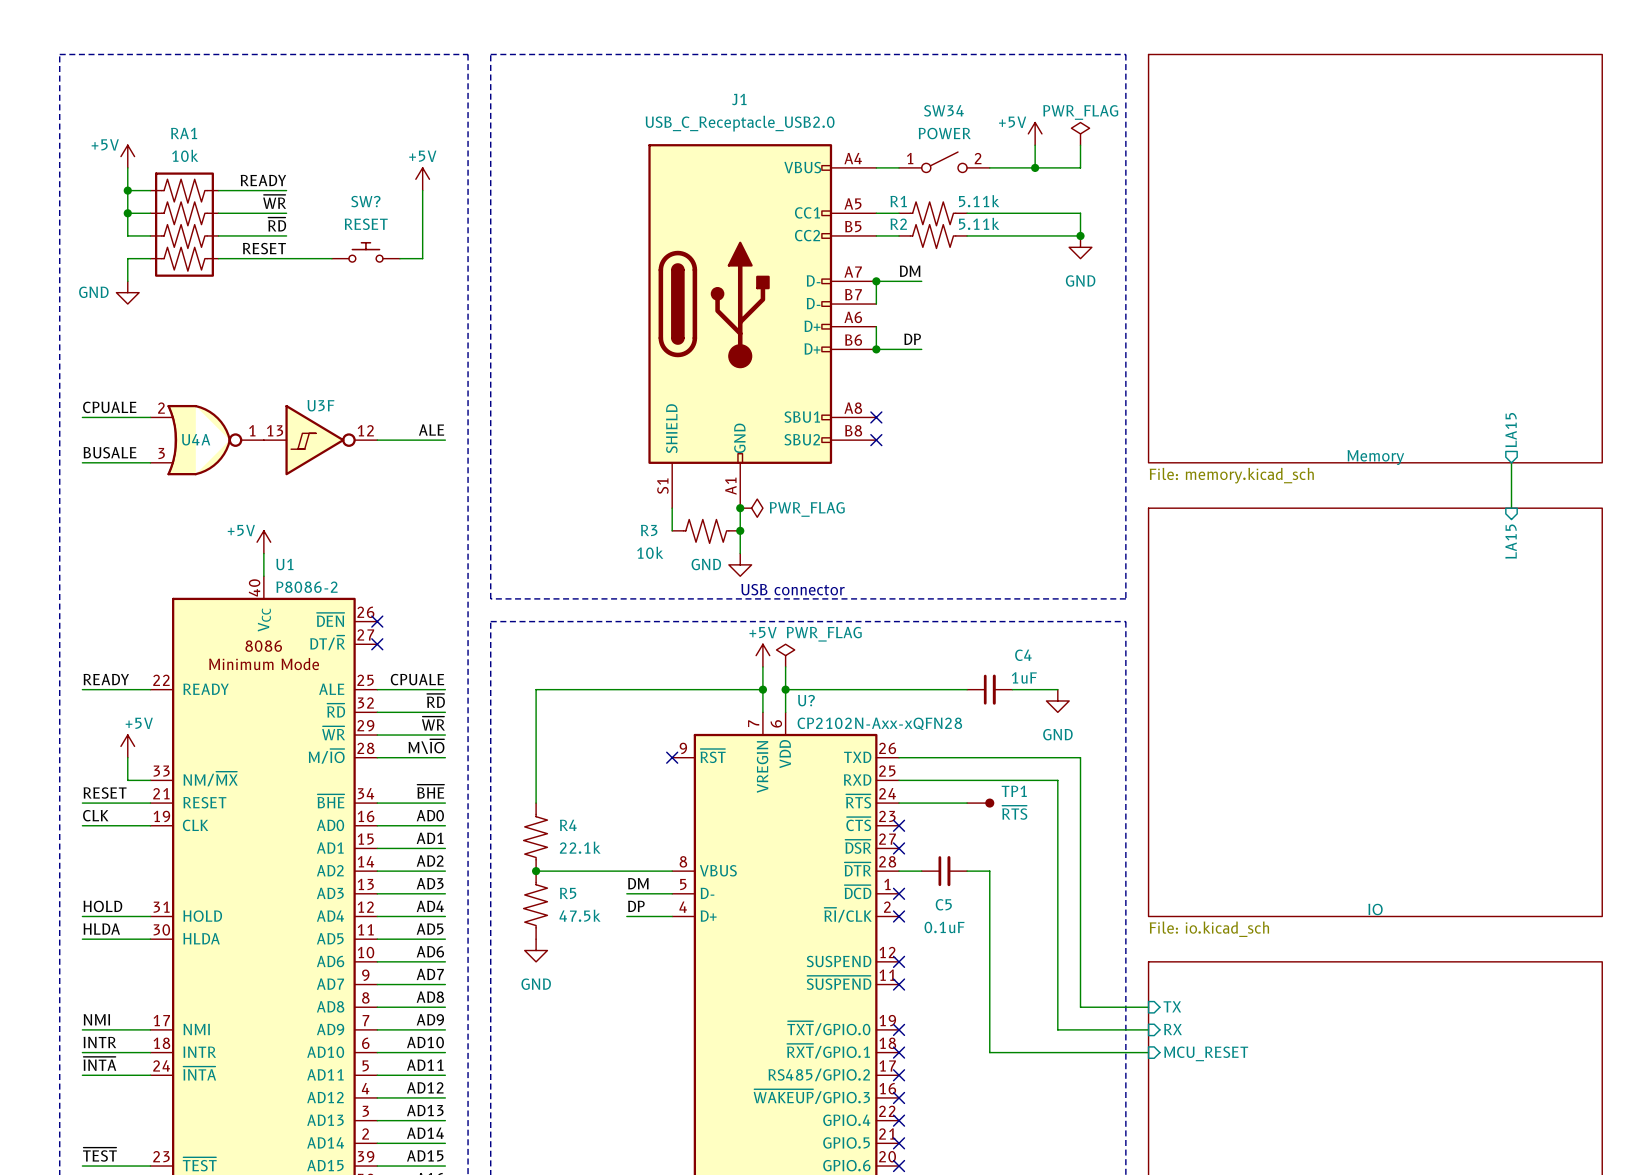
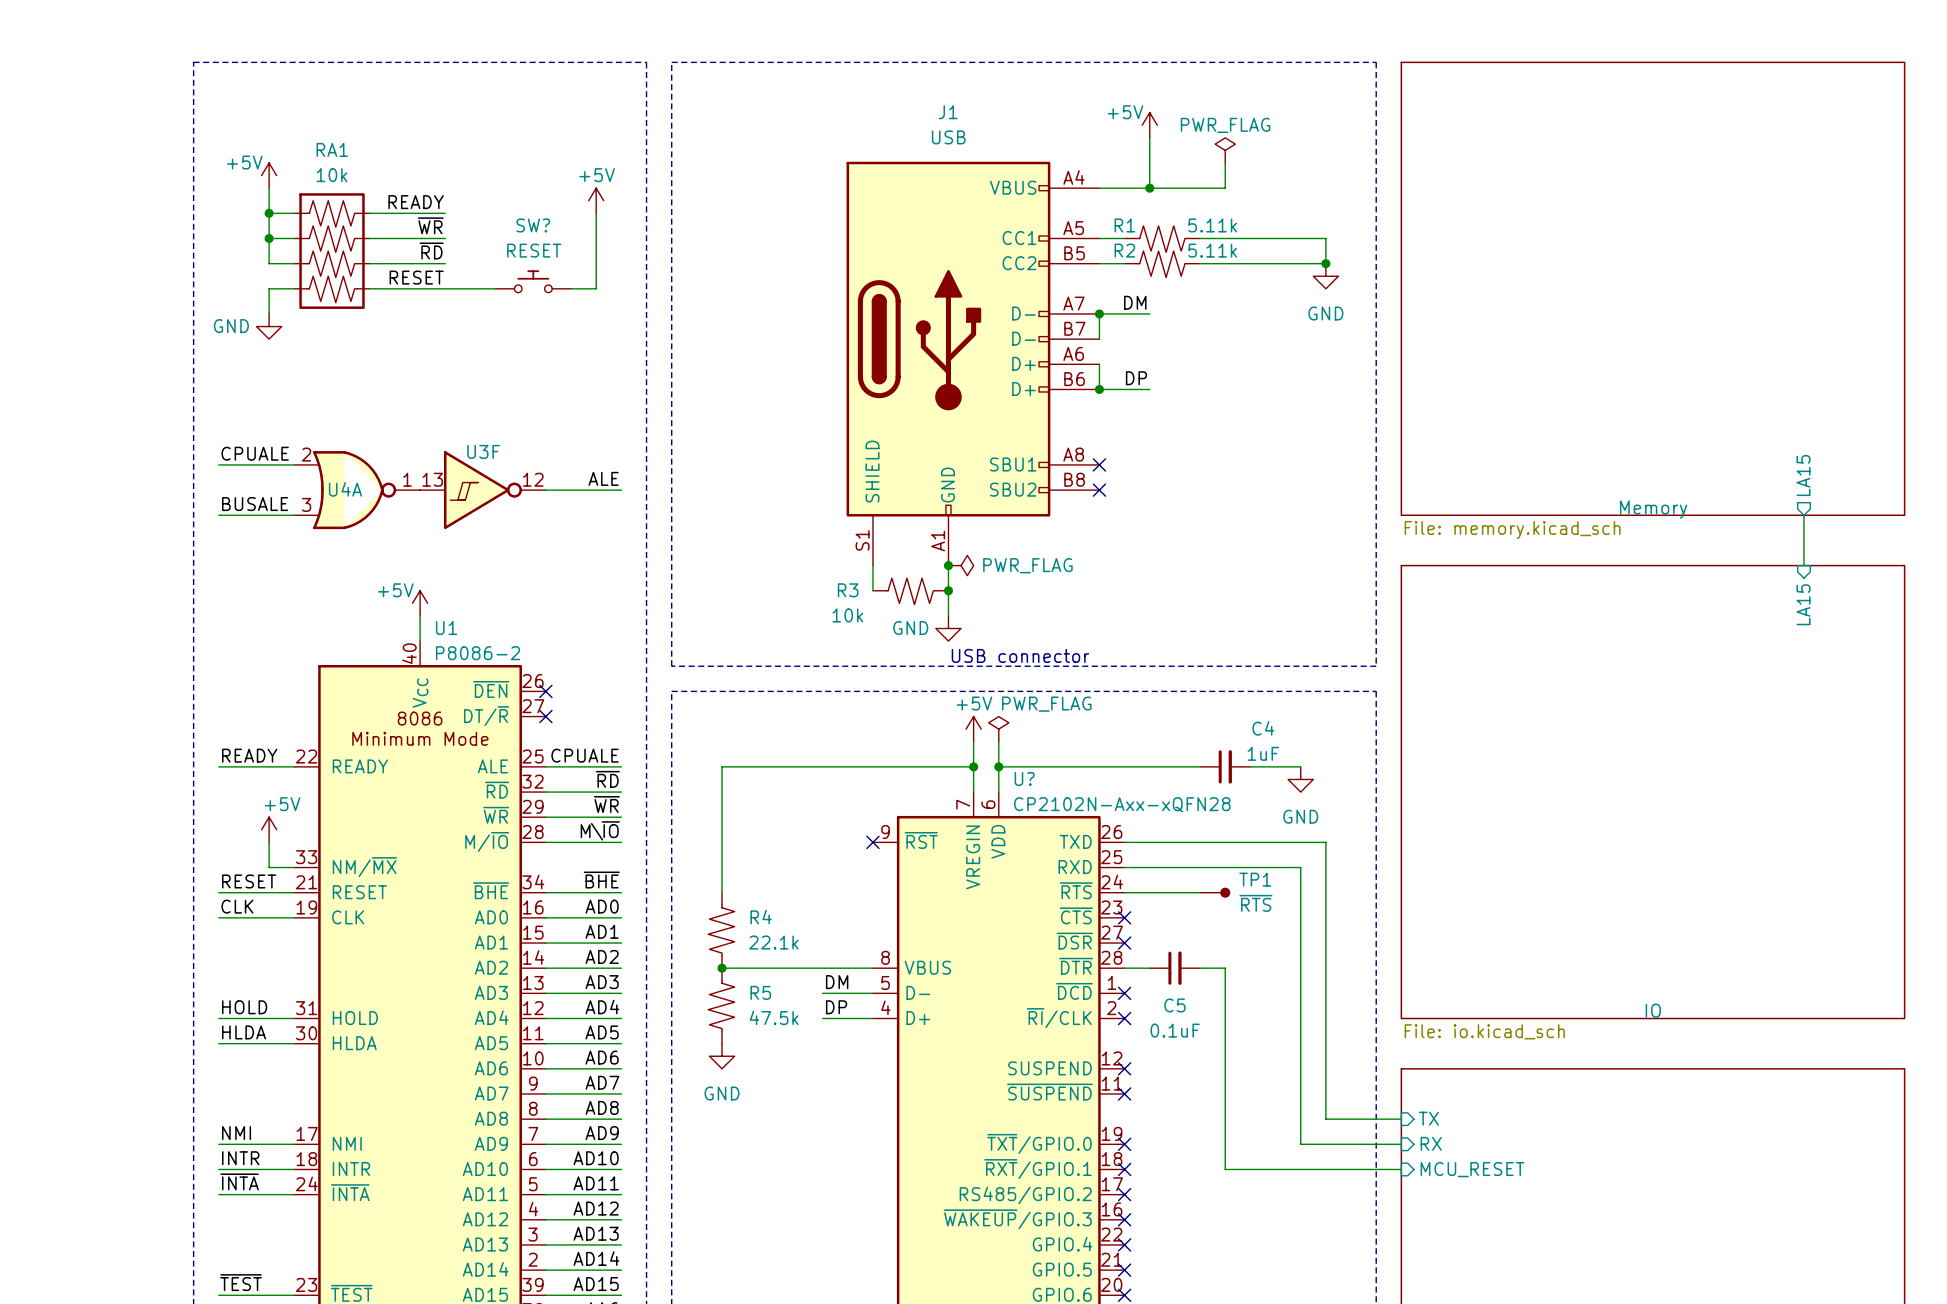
wire: none -> (1149, 137) (1149, 188)
J1 value: USB_C_Receptacle_USB2.0 (740, 123) -> USB (948, 137)
power symbol position: +5V (1035, 133) -> +5V (1149, 125)
power symbol position: PWR_FLAG (1080, 133) -> PWR_FLAG (1225, 150)
wire: (1035, 145) (1035, 167) -> none
wire: (1080, 145) (1080, 167) (989, 167) -> (1225, 163) (1225, 188) (1124, 188)
SW34: POWER (944, 162) -> none
junction: none -> (1149, 188)
junction: (1035, 167) -> none

